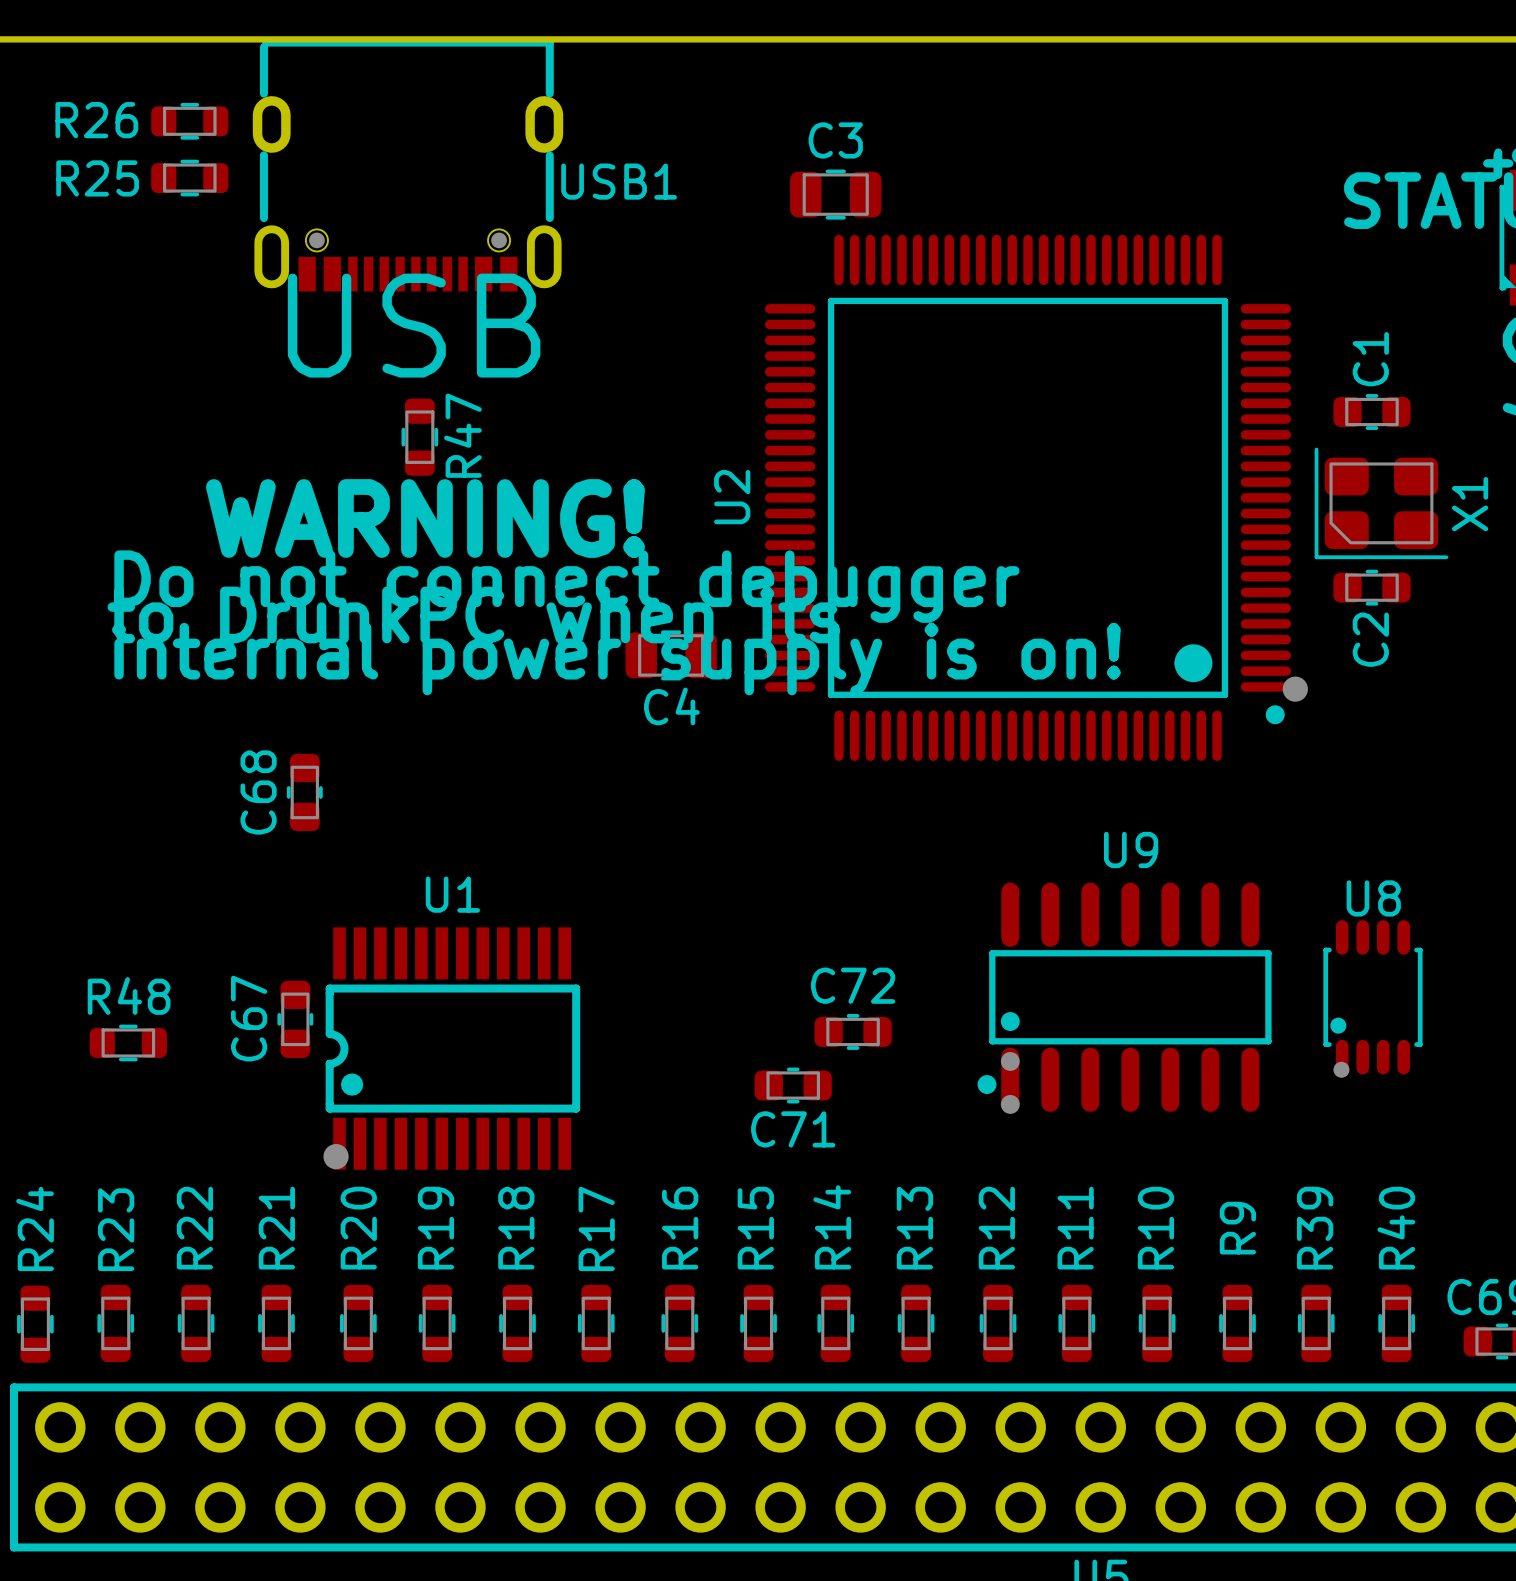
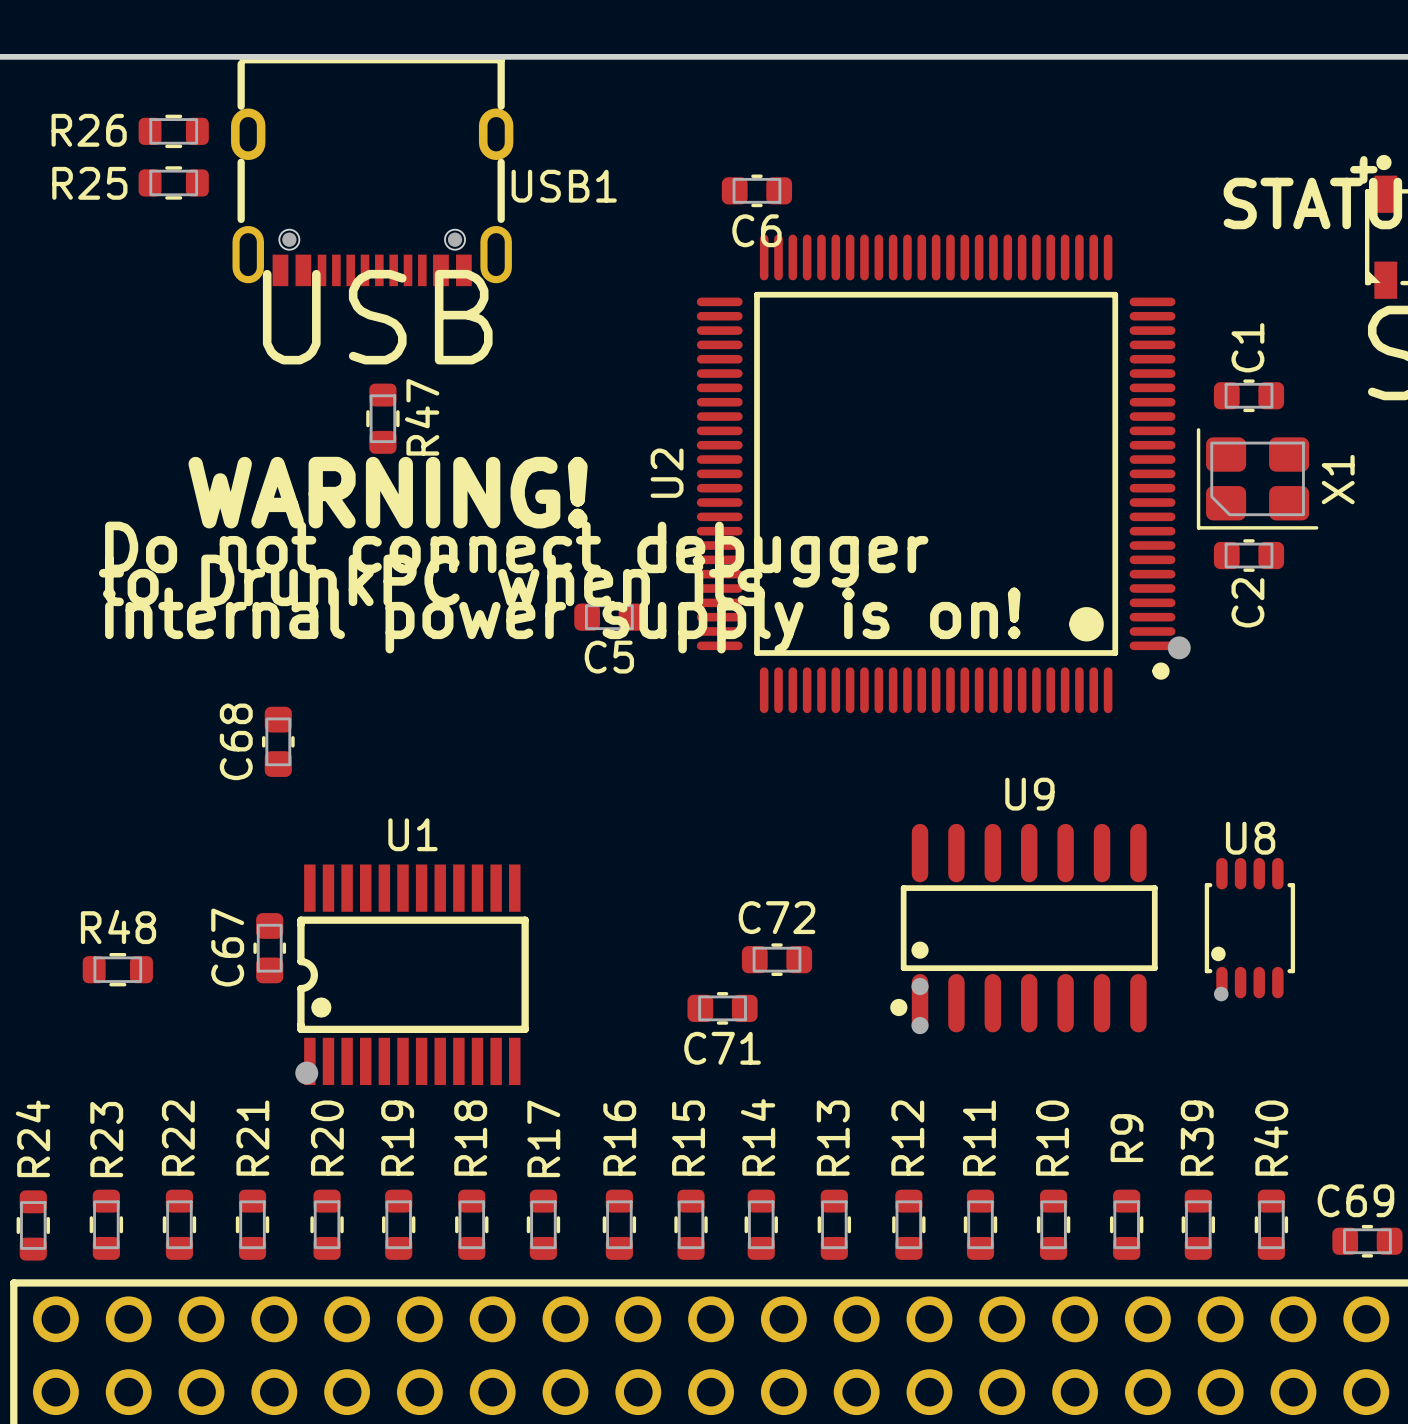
C6: none -> (756, 190)
C3: (835, 194) -> none
C5: none -> (609, 617)
C4: (671, 655) -> none

